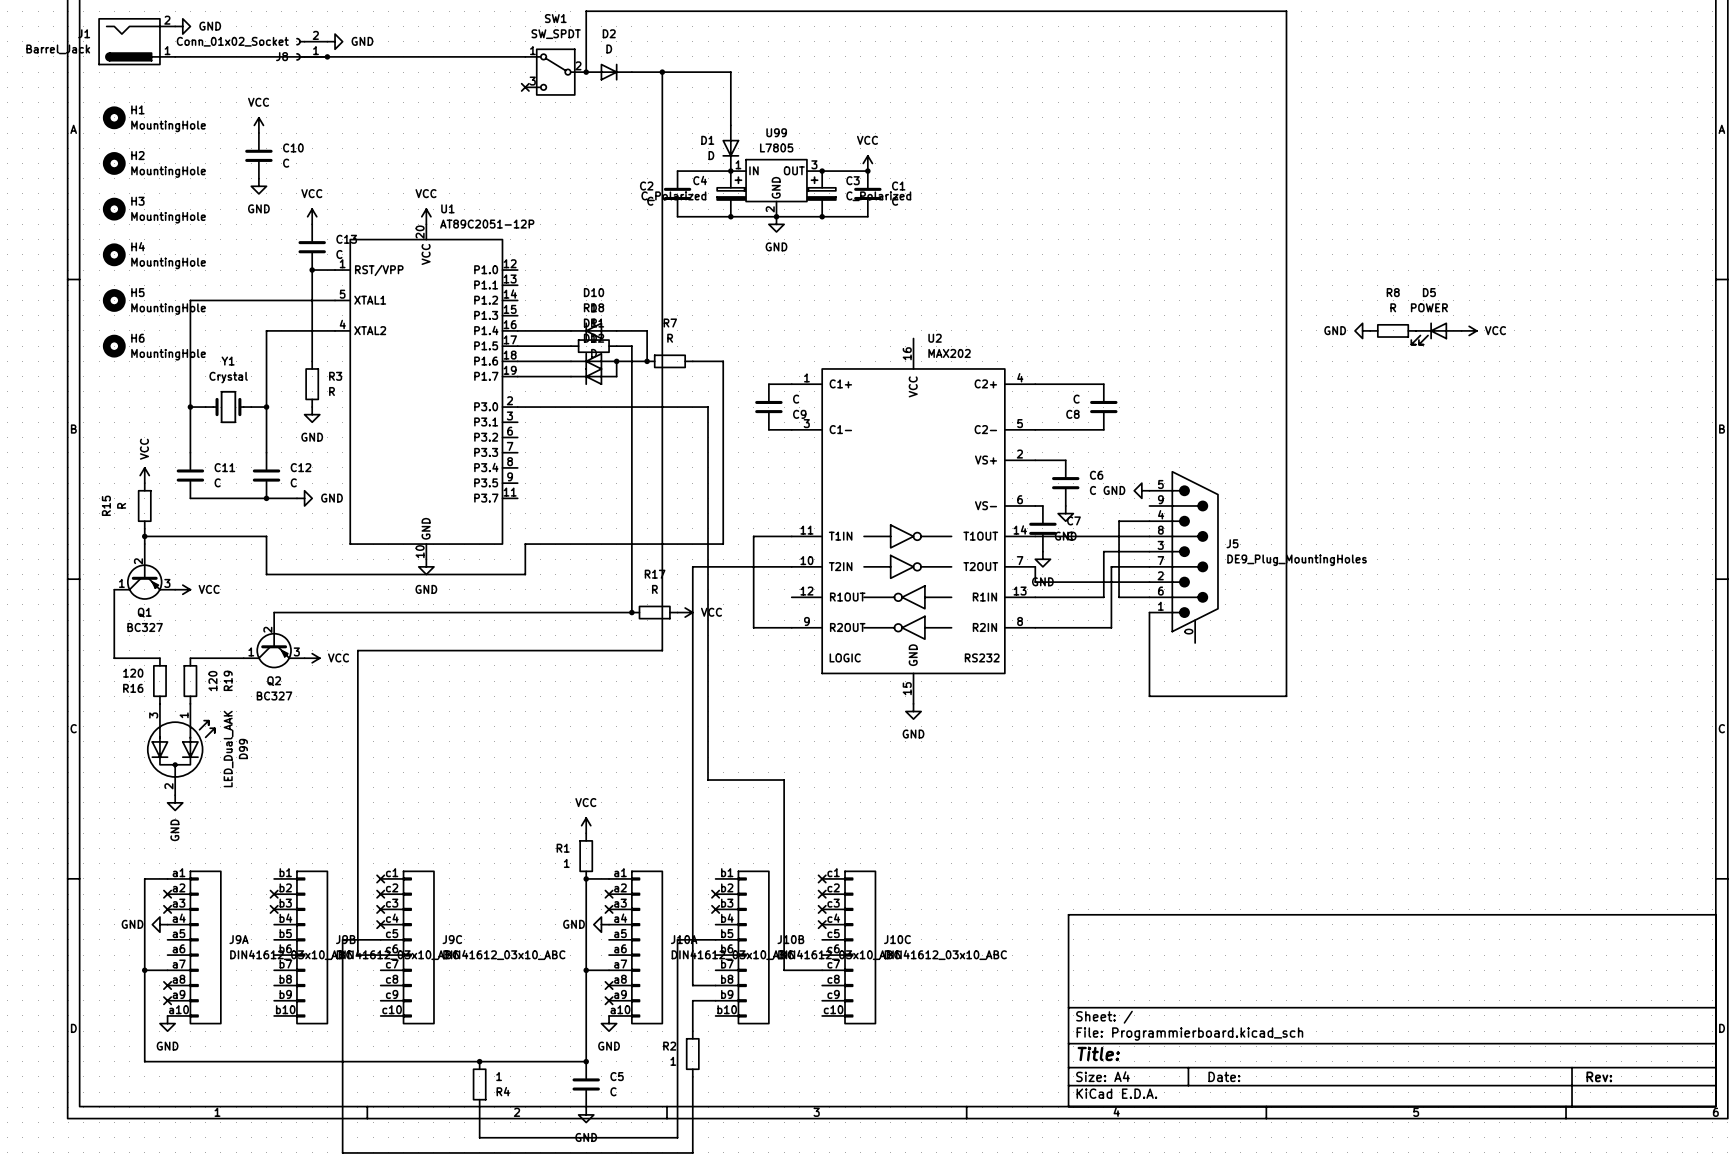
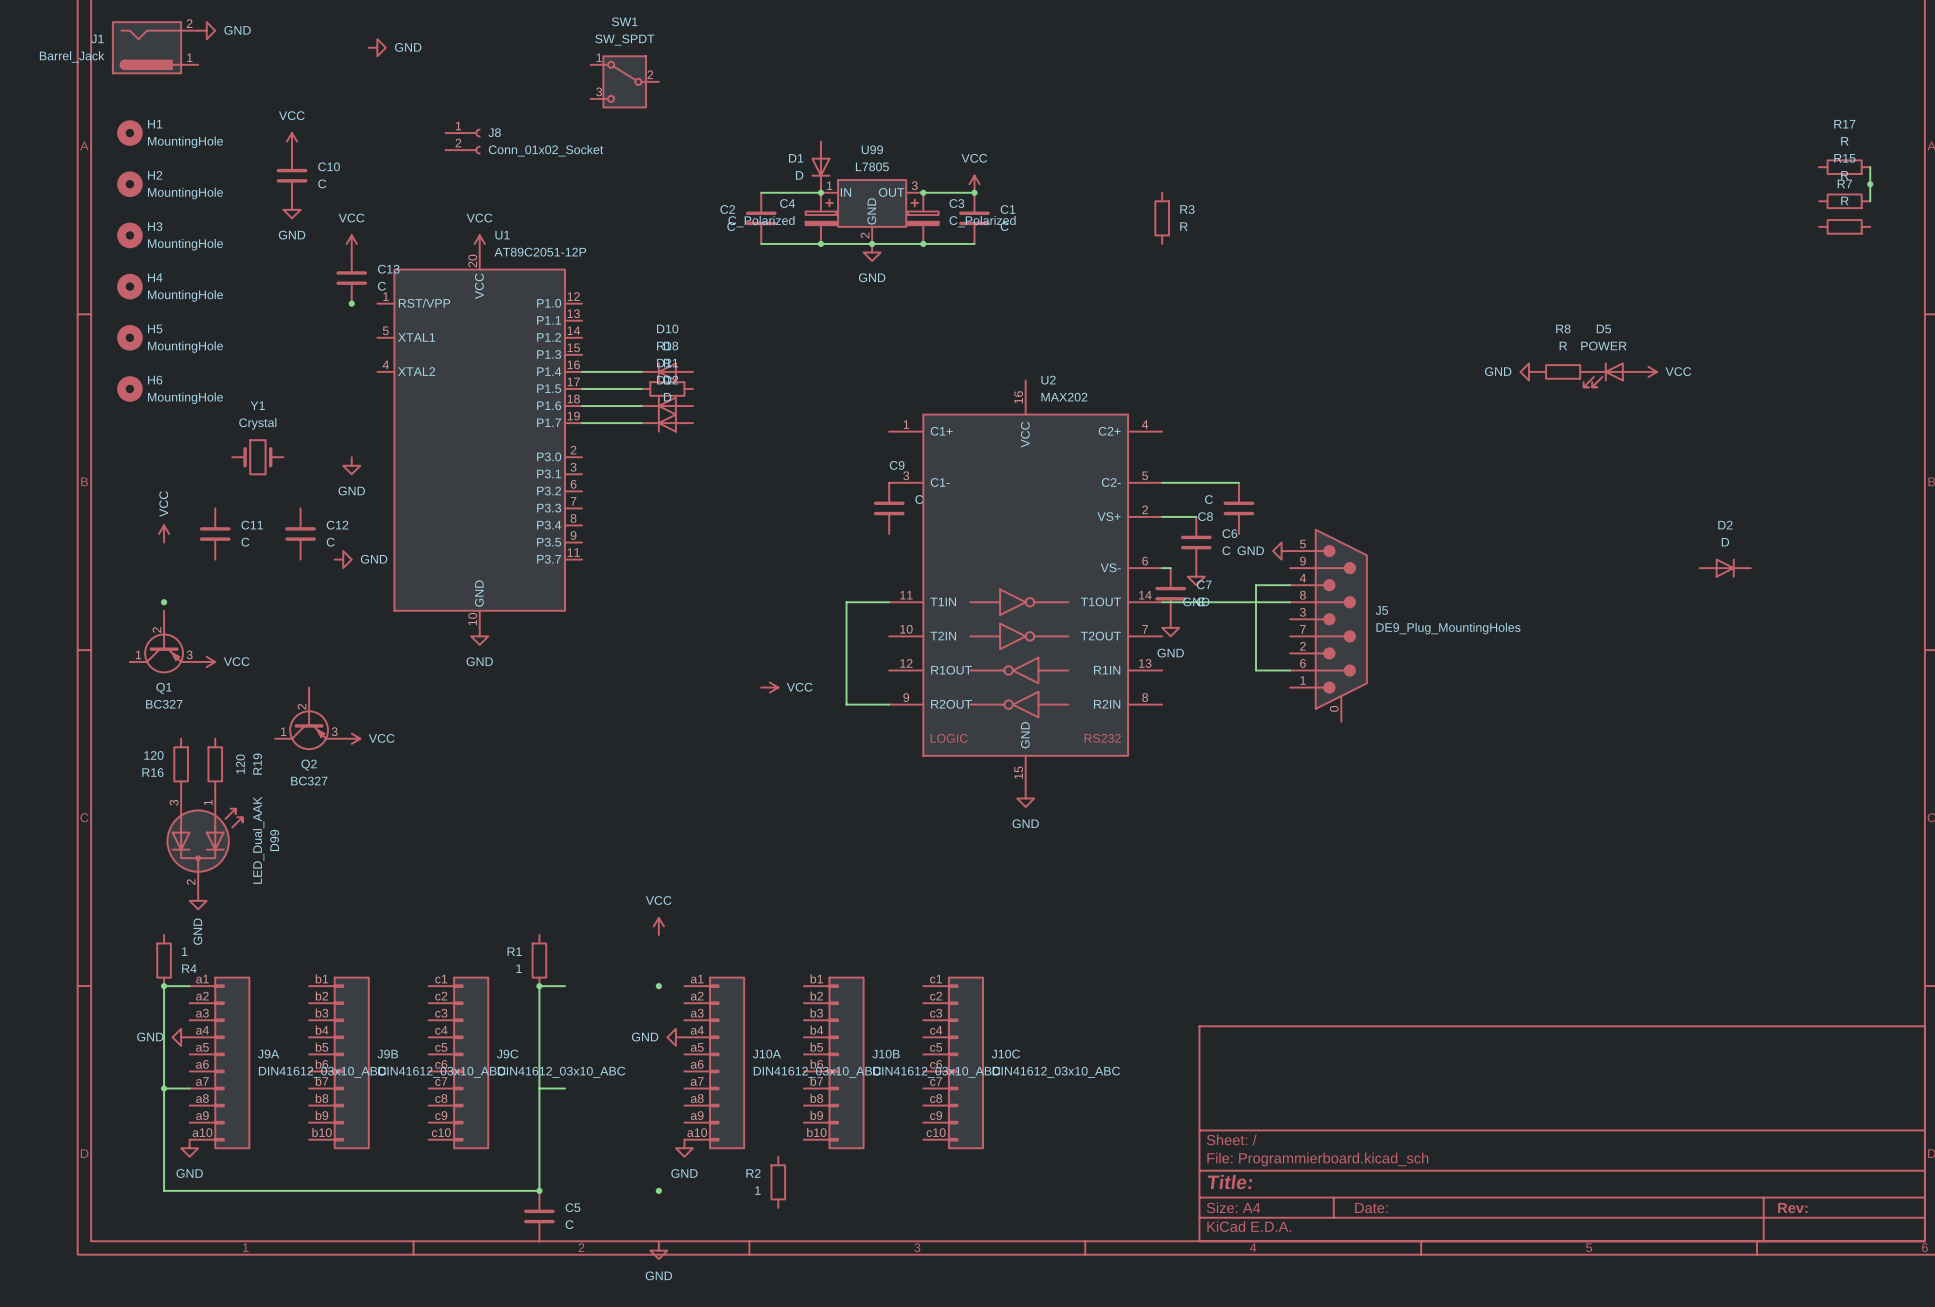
J8 rotation: 0° (300, 49) -> 180° (475, 141)
J8 position: (311, 49) -> (462, 141)
wire: (175, 56) (525, 56) -> none
junction: (327, 56) -> none
wire: (586, 72) (586, 11) (1286, 11) (1286, 696) (1149, 696) (1149, 612) -> none
junction: (586, 72) -> none
D2 position: (609, 72) -> (1725, 568)
wire: (631, 72) (730, 72) (730, 125) -> none
wire: (662, 72) (662, 650) (357, 650) (357, 955) (380, 955) -> none
junction: (662, 72) -> none
no-connect mark: (525, 87) -> none
wire: none -> (1870, 167) (1870, 201)
junction: none -> (1870, 184)
wire: (335, 270) (312, 270) (312, 361) -> none
wire: (335, 300) (190, 300) (190, 452) -> none
wire: (335, 330) (266, 330) (266, 452) -> none
wire: (616, 330) (647, 330) (647, 361) (616, 361) (616, 376) -> none
wire: (616, 346) (631, 346) (631, 612) (274, 612) -> none
junction: (616, 361) -> none
junction: (647, 361) -> none
R7 position: (669, 361) -> (1844, 226)
wire: (692, 361) (723, 361) (723, 544) (525, 544) (525, 574) (266, 574) (266, 536) (144, 536) -> none
R3 position: (312, 384) -> (1162, 218)
wire: (768, 384) (791, 384) -> none
wire: (1035, 384) (1103, 384) -> none
wire: (190, 407) (205, 407) -> none
junction: (190, 407) -> none
wire: (251, 407) (266, 407) -> none
junction: (266, 407) -> none
wire: (517, 407) (708, 407) (708, 780) (784, 780) (784, 970) (822, 970) -> none
C9 position: (768, 407) -> (889, 508)
C8 position: (1103, 407) -> (1238, 508)
wire: (768, 429) (791, 429) -> none
wire: (190, 498) (296, 498) -> none
junction: (266, 498) -> none
R15 rotation: 0° (144, 505) -> 90° clockwise (1844, 201)
R15 position: (144, 505) -> (1844, 201)
wire: (144, 528) (144, 544) -> none
wire: (1149, 551) (1103, 551) (1103, 597) (1035, 597) -> none
wire: (791, 566) (692, 566) (692, 985) (715, 985) -> none
wire: (1035, 566) (1035, 582) (1149, 582) -> none
wire: (1149, 566) (1111, 566) (1111, 627) (1035, 627) -> none
wire: (114, 589) (114, 658) (159, 658) -> none
junction: (631, 612) -> none
R17 position: (654, 612) -> (1844, 167)
wire: (190, 658) (243, 658) -> none
R1 position: (586, 856) -> (539, 960)
junction: none -> (164, 986)
no-connect mark: (380, 878) -> none
junction: none -> (539, 986)
wire: (609, 878) (586, 878) (586, 1061) (479, 1061) -> (565, 986) (539, 986) (539, 1190)
no-connect mark: (822, 878) -> none
no-connect mark: (167, 894) -> none
no-connect mark: (274, 894) -> none
no-connect mark: (380, 894) -> none
no-connect mark: (609, 894) -> none
no-connect mark: (715, 894) -> none
no-connect mark: (822, 894) -> none
no-connect mark: (167, 909) -> none
no-connect mark: (274, 909) -> none
no-connect mark: (380, 909) -> none
no-connect mark: (609, 909) -> none
no-connect mark: (715, 909) -> none
no-connect mark: (822, 909) -> none
no-connect mark: (380, 924) -> none
no-connect mark: (822, 924) -> none
wire: (380, 939) (342, 939) (342, 1152) (692, 1152) (692, 1076) -> none
wire: (715, 939) (677, 939) (677, 1137) (479, 1137) (479, 1107) -> none
wire: (586, 970) (609, 970) -> (539, 1088) (565, 1088)
junction: (586, 970) -> none
no-connect mark: (167, 985) -> none
no-connect mark: (609, 985) -> none
no-connect mark: (167, 1000) -> none
no-connect mark: (609, 1000) -> none
wire: (715, 1000) (692, 1000) (692, 1031) -> none
R4 position: (479, 1084) -> (164, 960)
C5 position: (586, 1084) -> (539, 1216)

